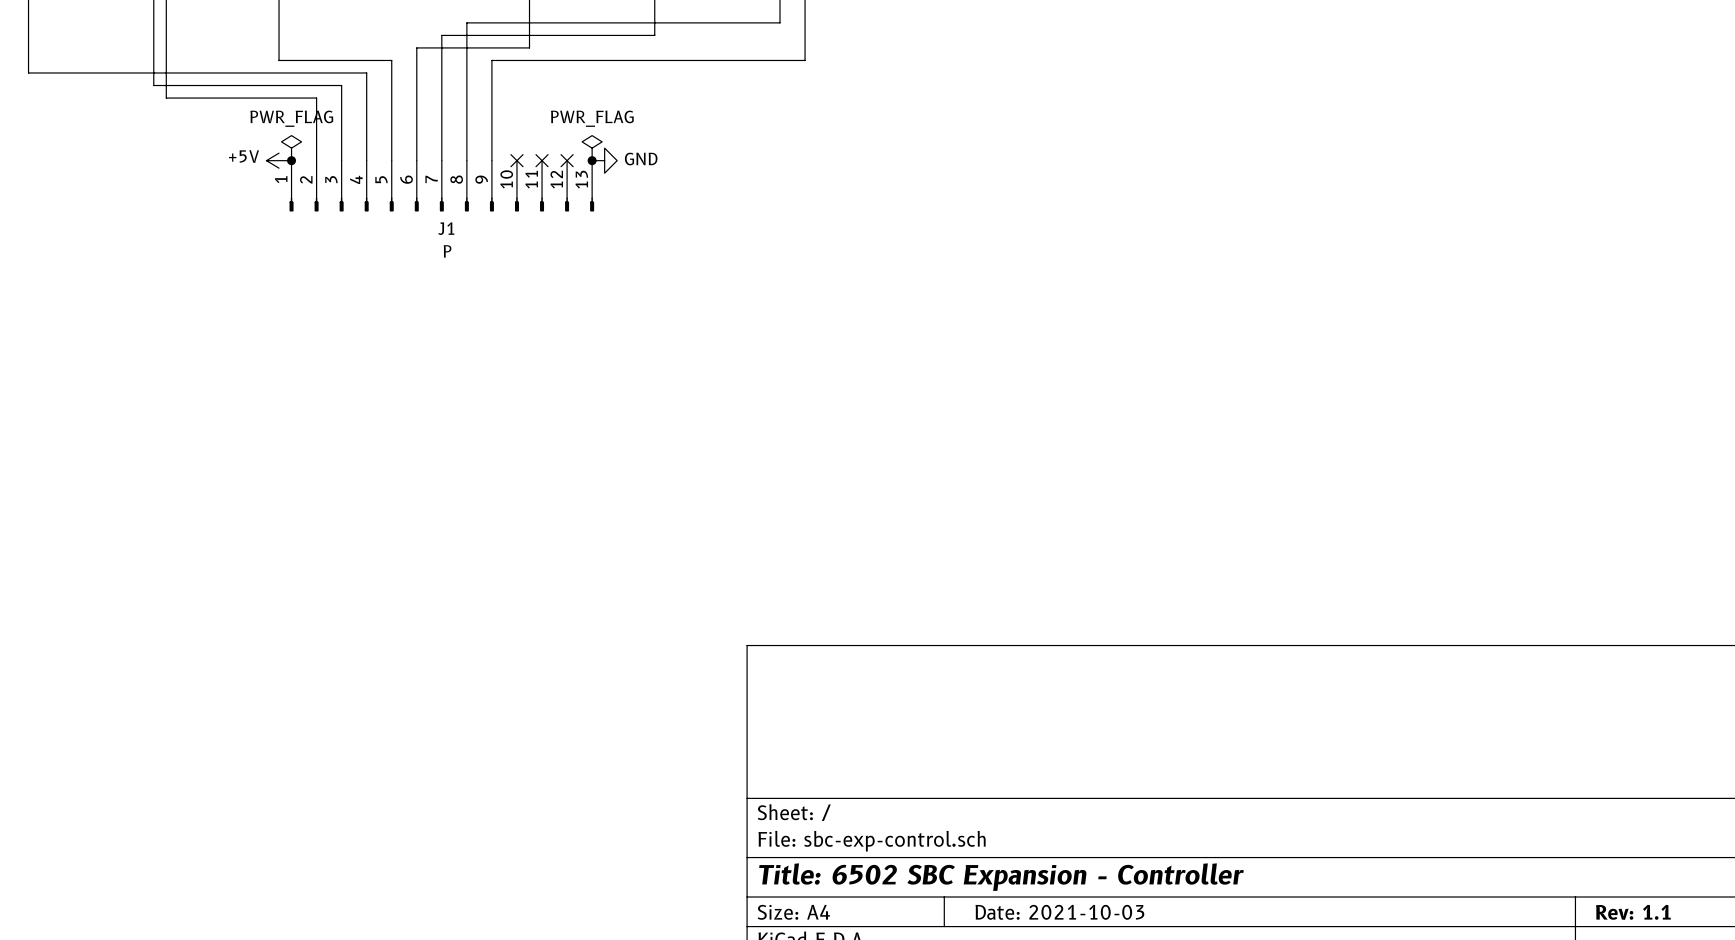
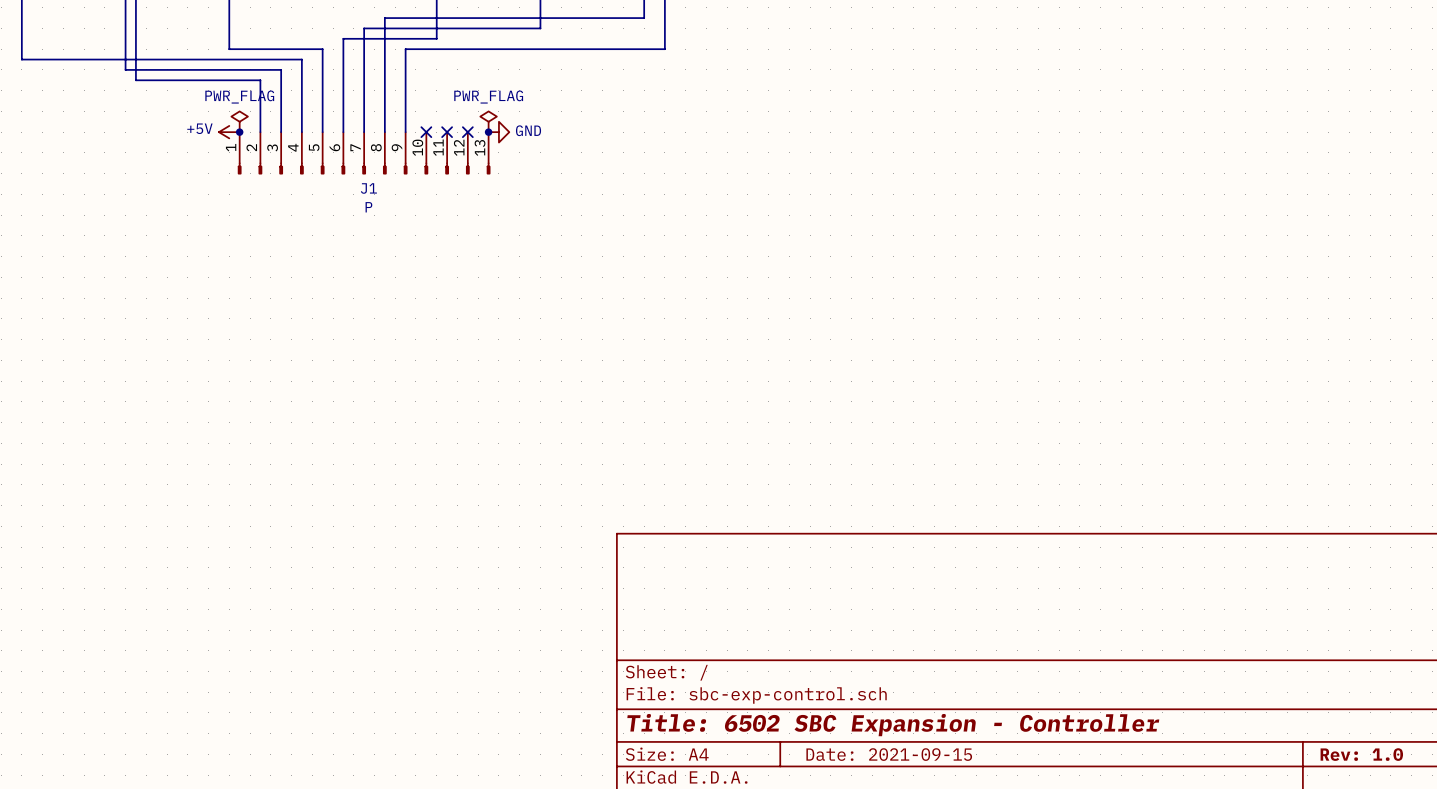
title block: Date: 2021-10-03 (1059, 912) -> Date: 2021-09-15 (889, 754)
title block: Rev: 1.1 (1633, 912) -> Rev: 1.0 (1361, 754)

